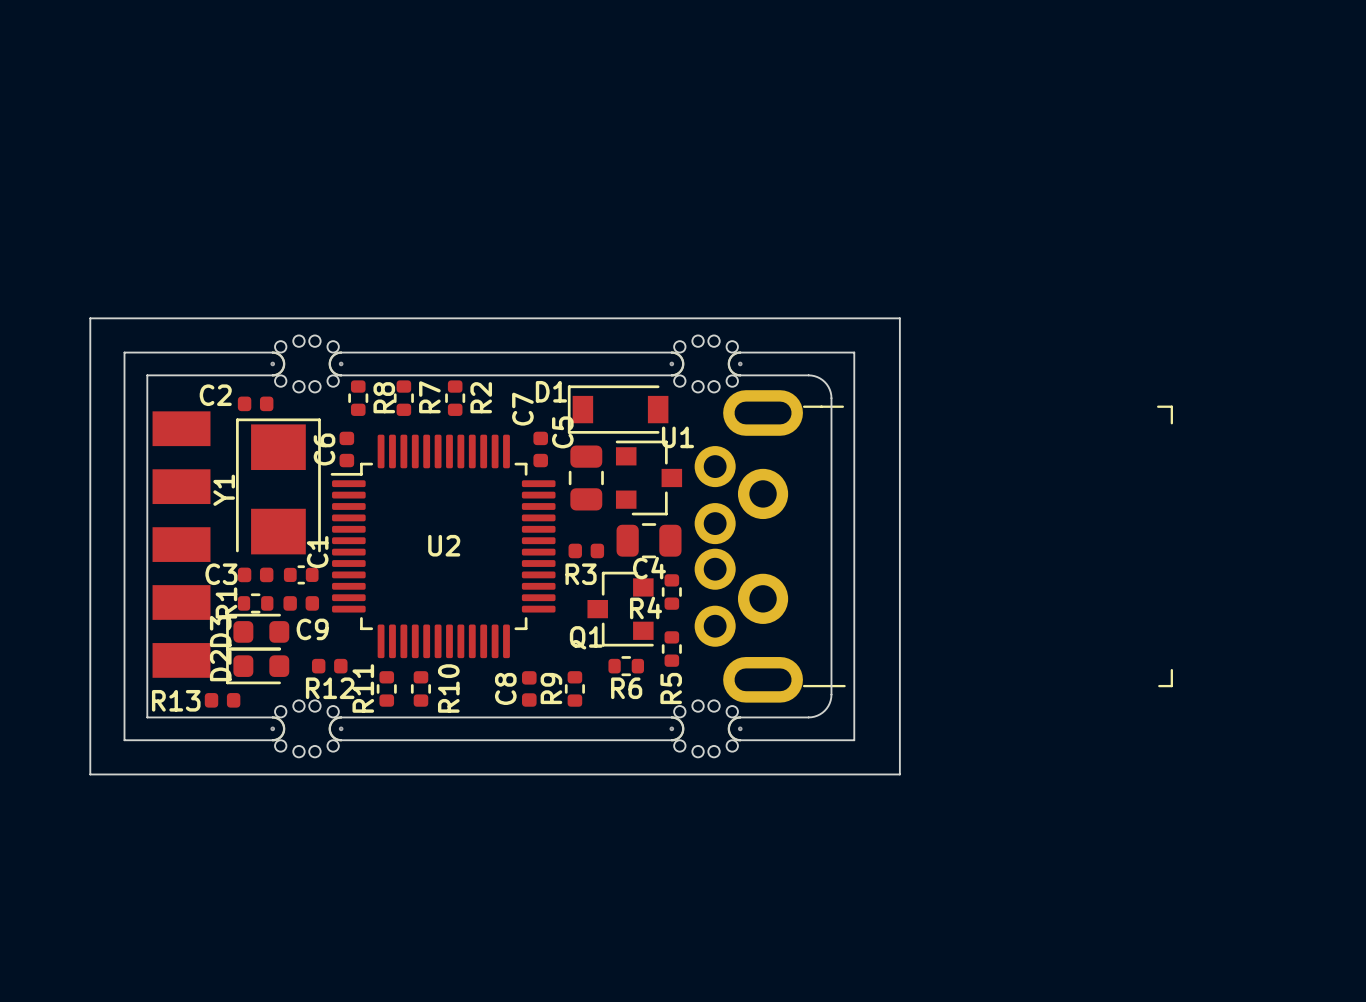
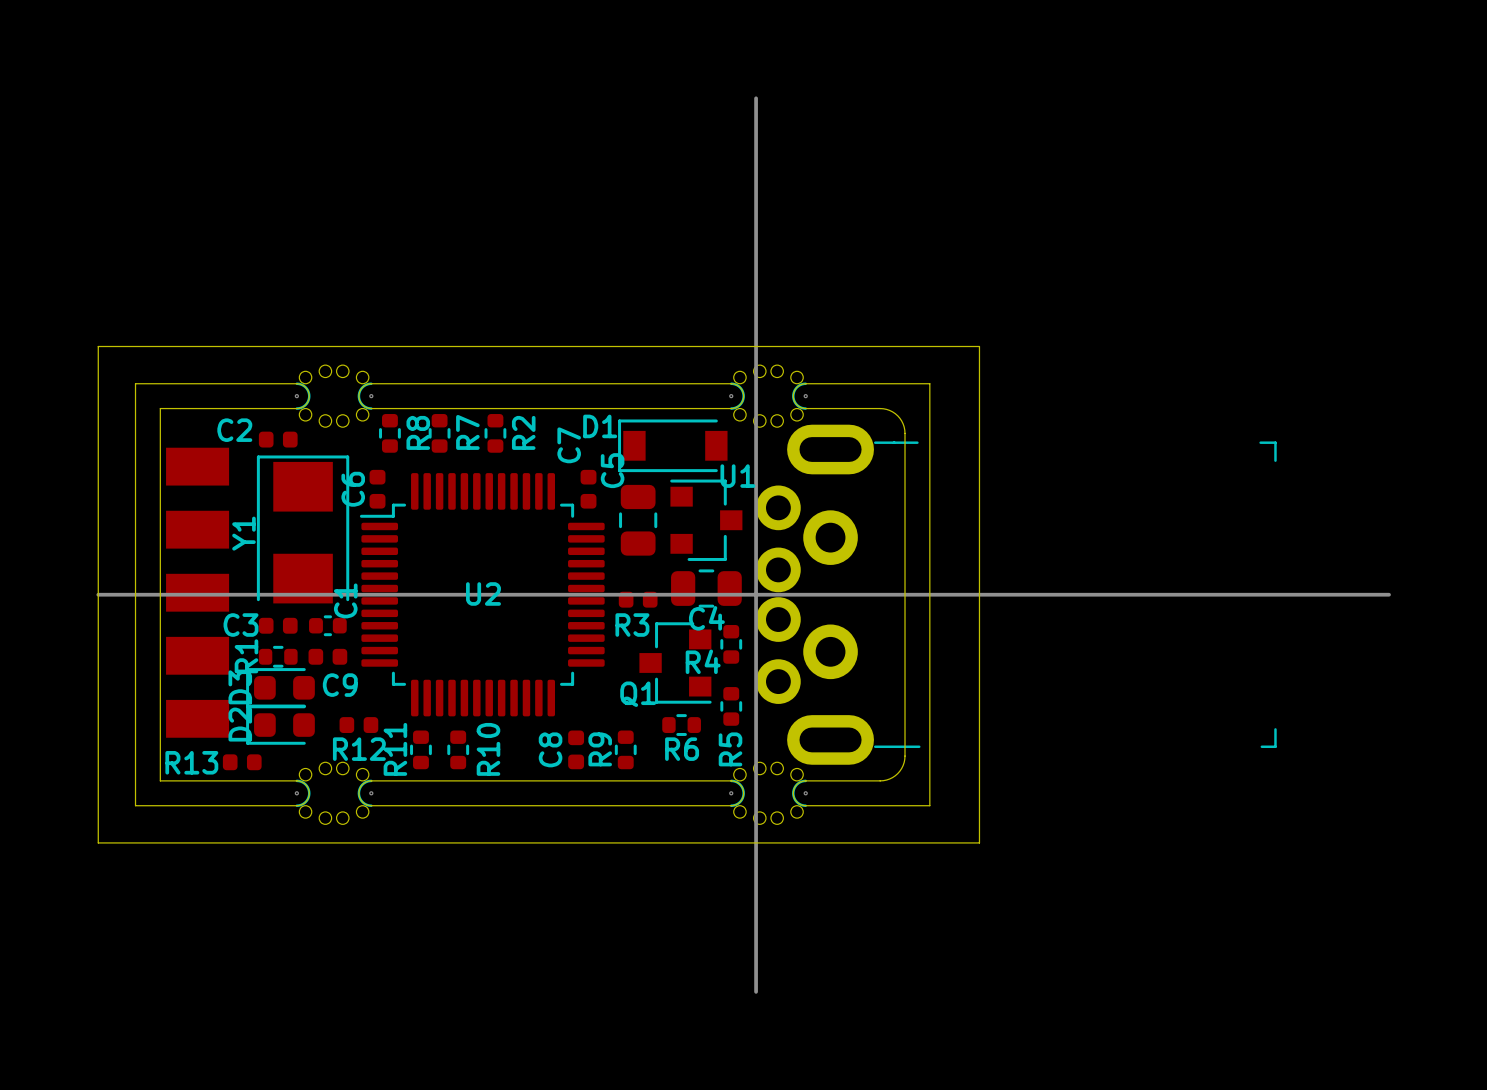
line: none -> (756, 98) (756, 991)
line: none -> (98, 594) (1389, 594)

